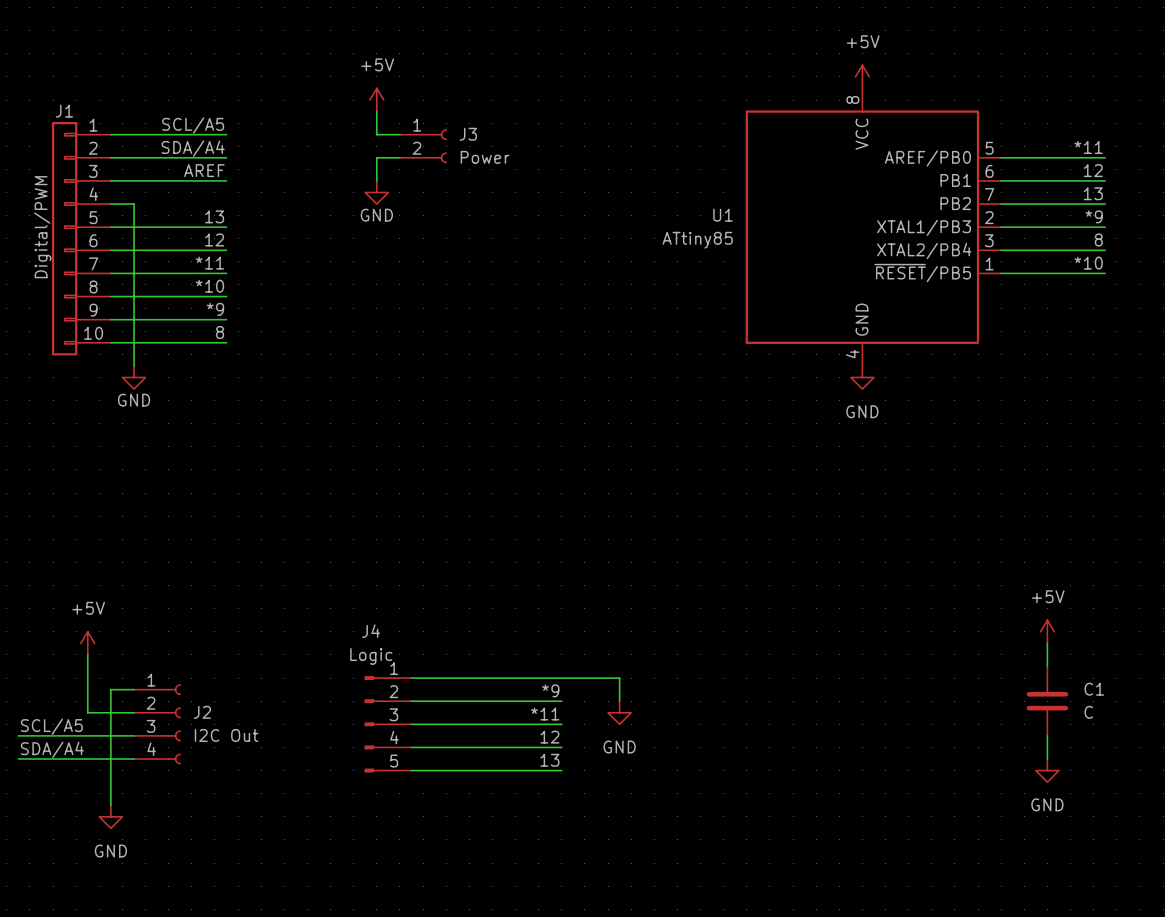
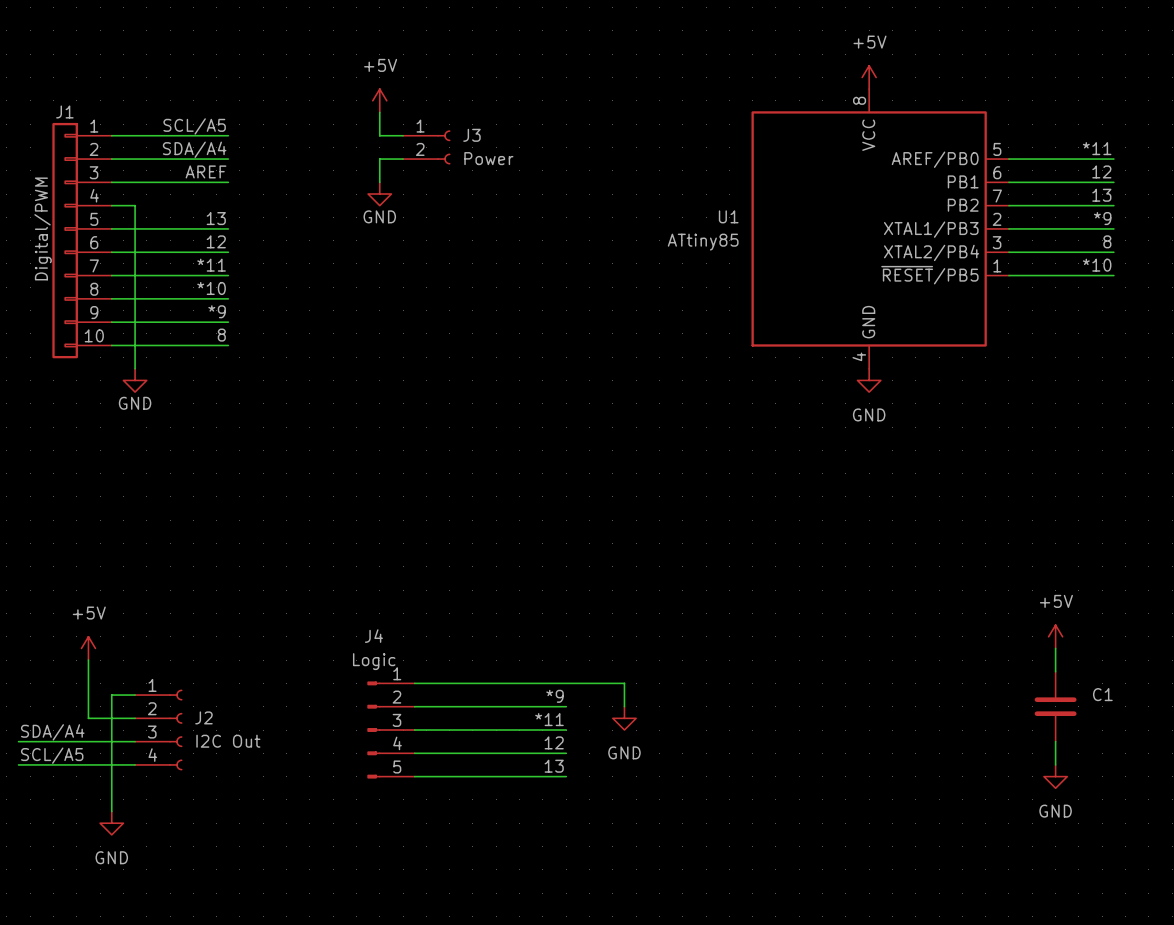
C1 value: C (1088, 712) -> none
label: SCL/A5 (51, 726) -> SDA/A4 (52, 732)
label: SDA/A4 (52, 749) -> SCL/A5 (52, 755)

